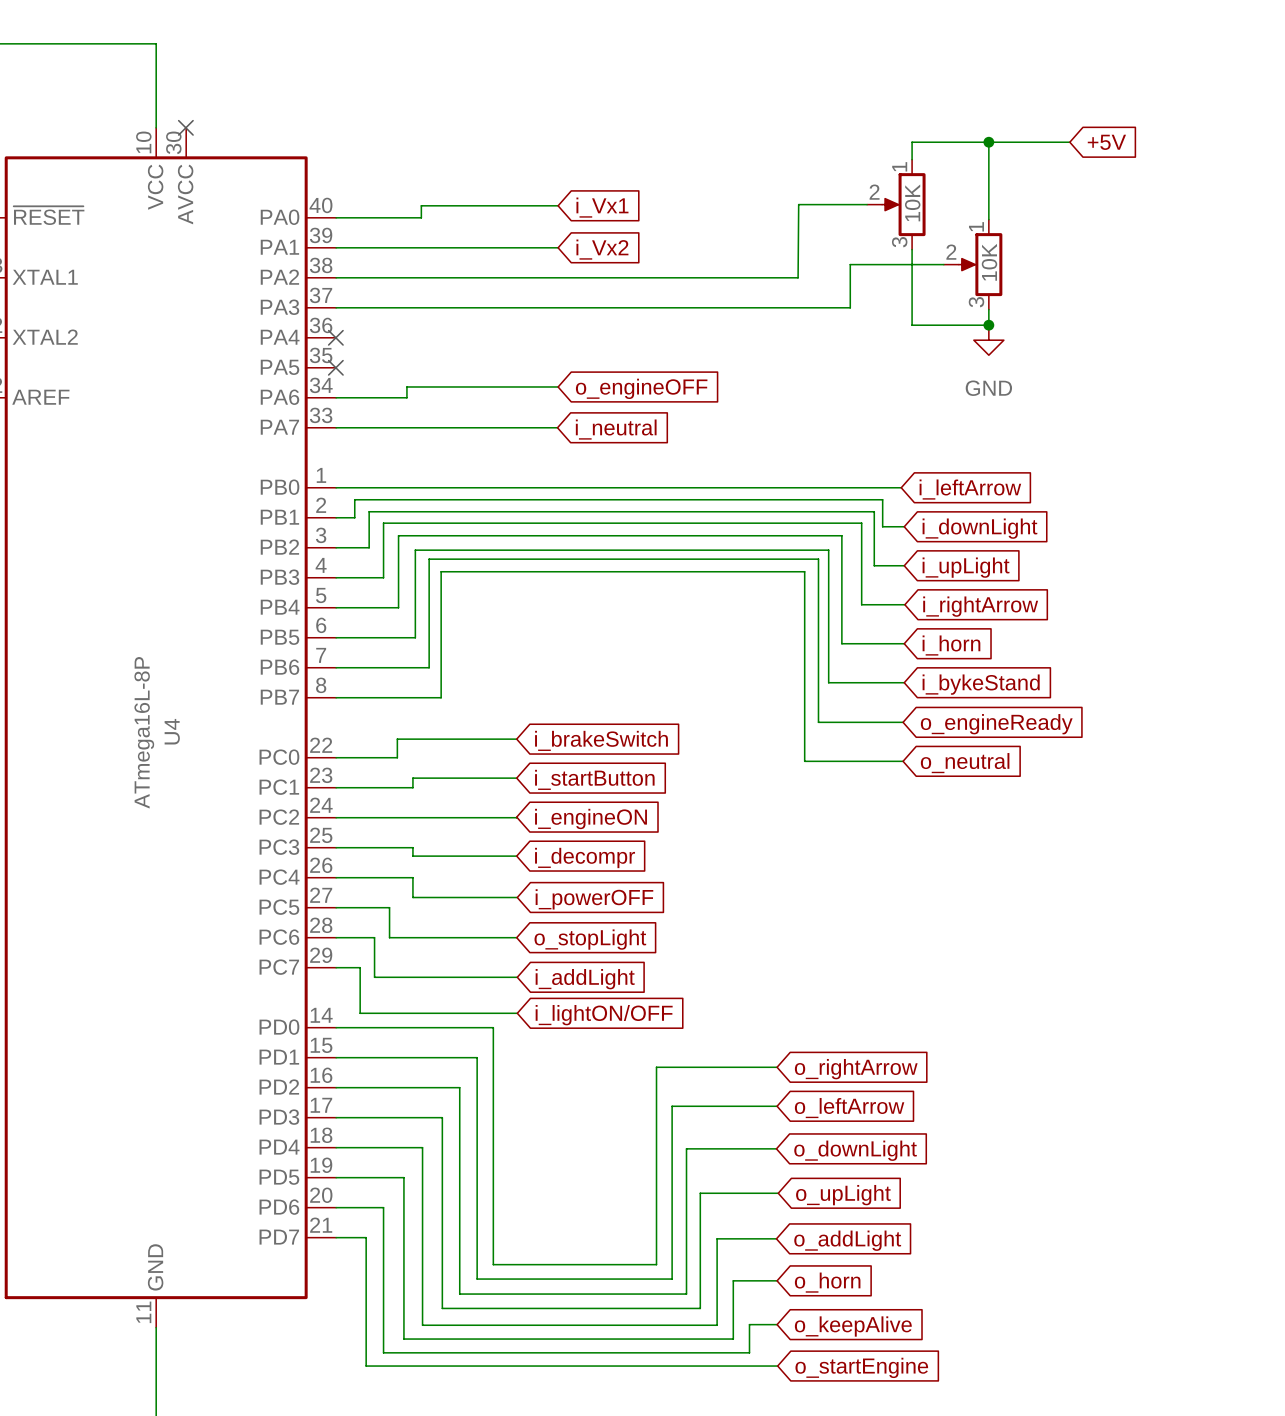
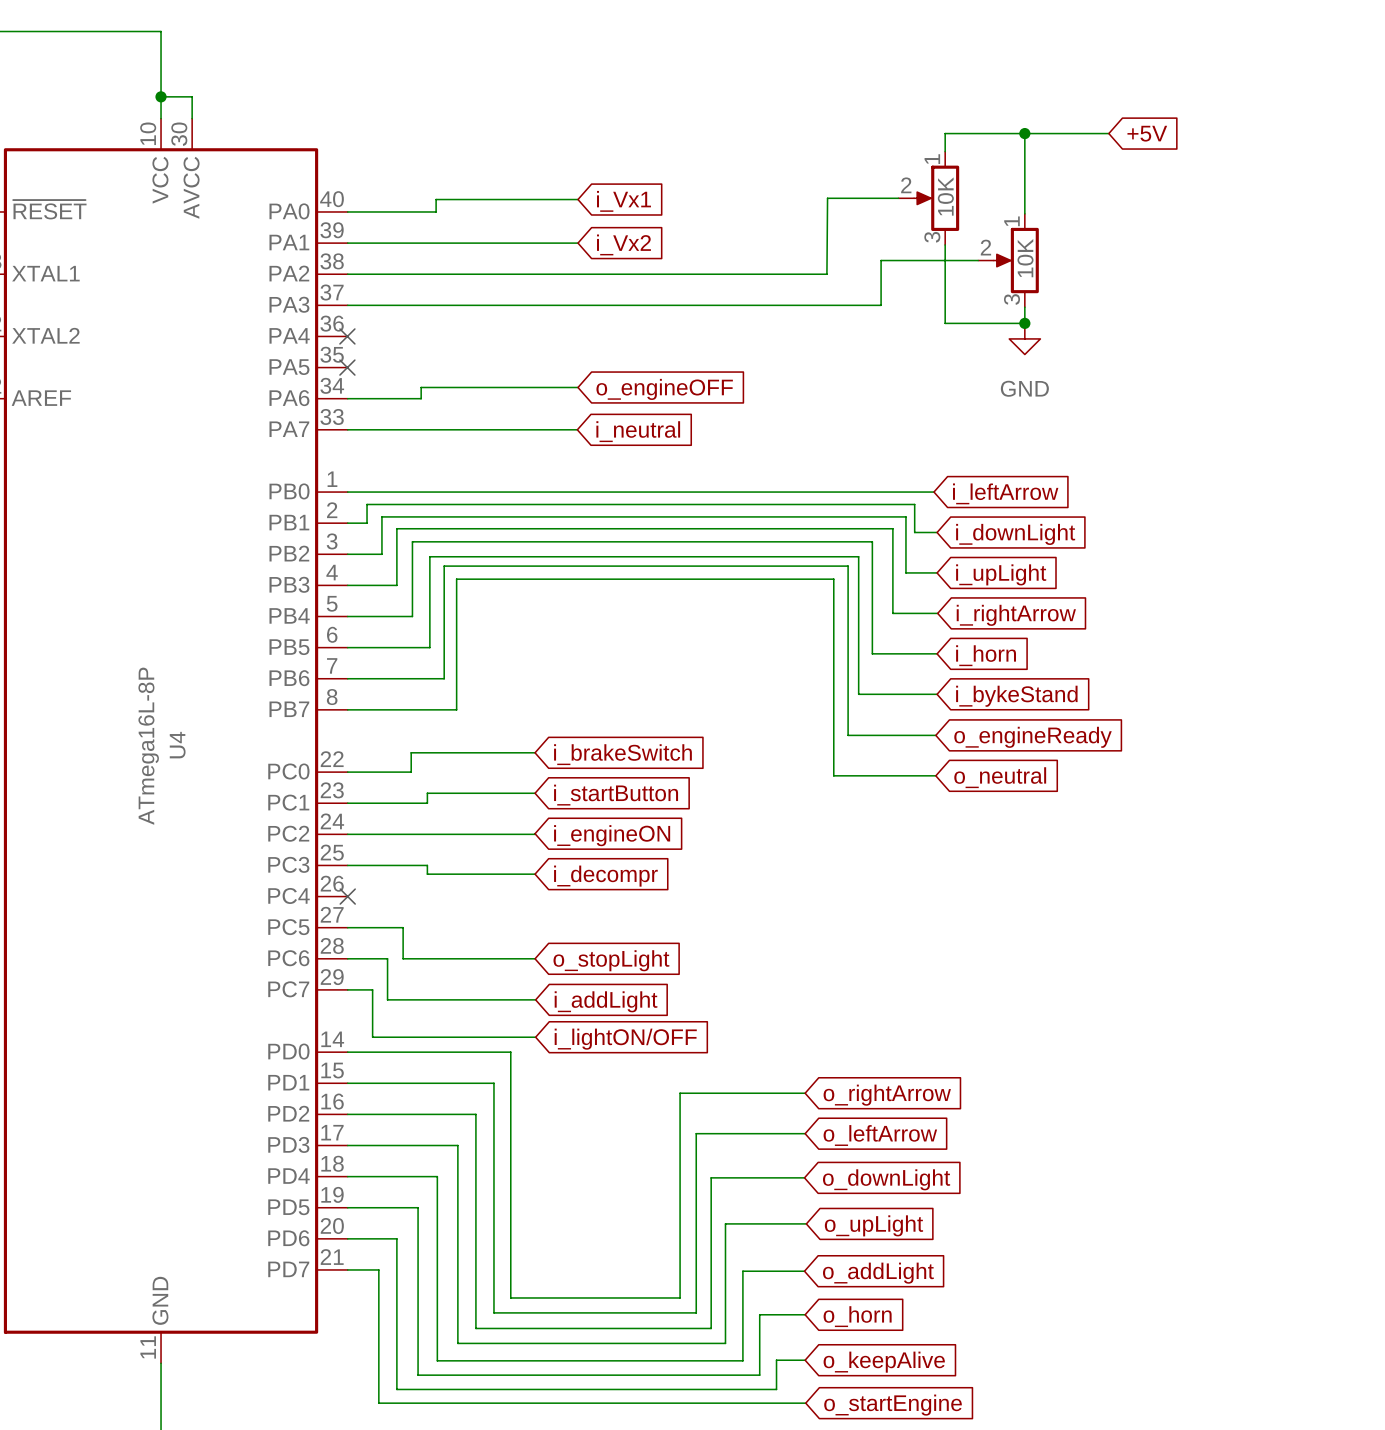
wire: none -> (161, 96) (192, 96) (192, 118)
junction: none -> (161, 96)
no-connect mark: (185, 127) -> none
wire: (336, 877) (412, 877) (412, 897) (517, 897) -> none
no-connect mark: none -> (347, 896)
global label: i_powerOFF (594, 899) -> none

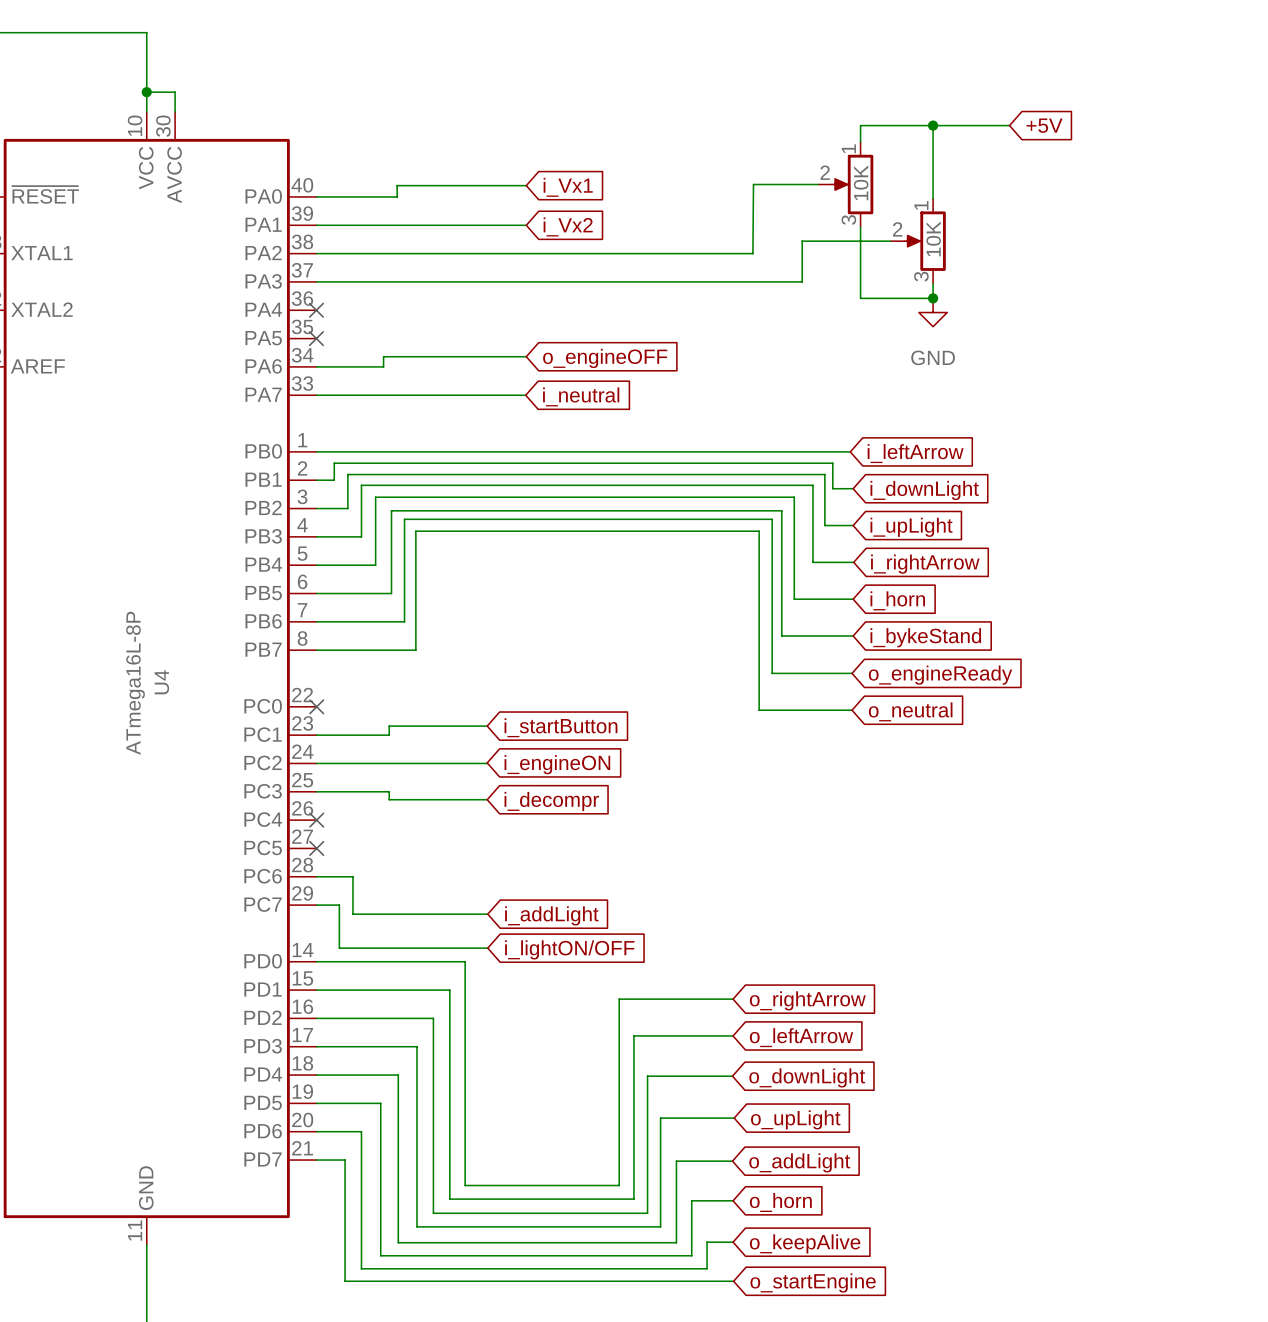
wire: (535, 752) (411, 752) (411, 772) (347, 772) -> none
global label: i_brakeSwitch (622, 754) -> none
no-connect mark: none -> (316, 706)
wire: (347, 927) (403, 927) (403, 958) (535, 958) -> none
no-connect mark: none -> (316, 848)
global label: o_stopLight (611, 960) -> none

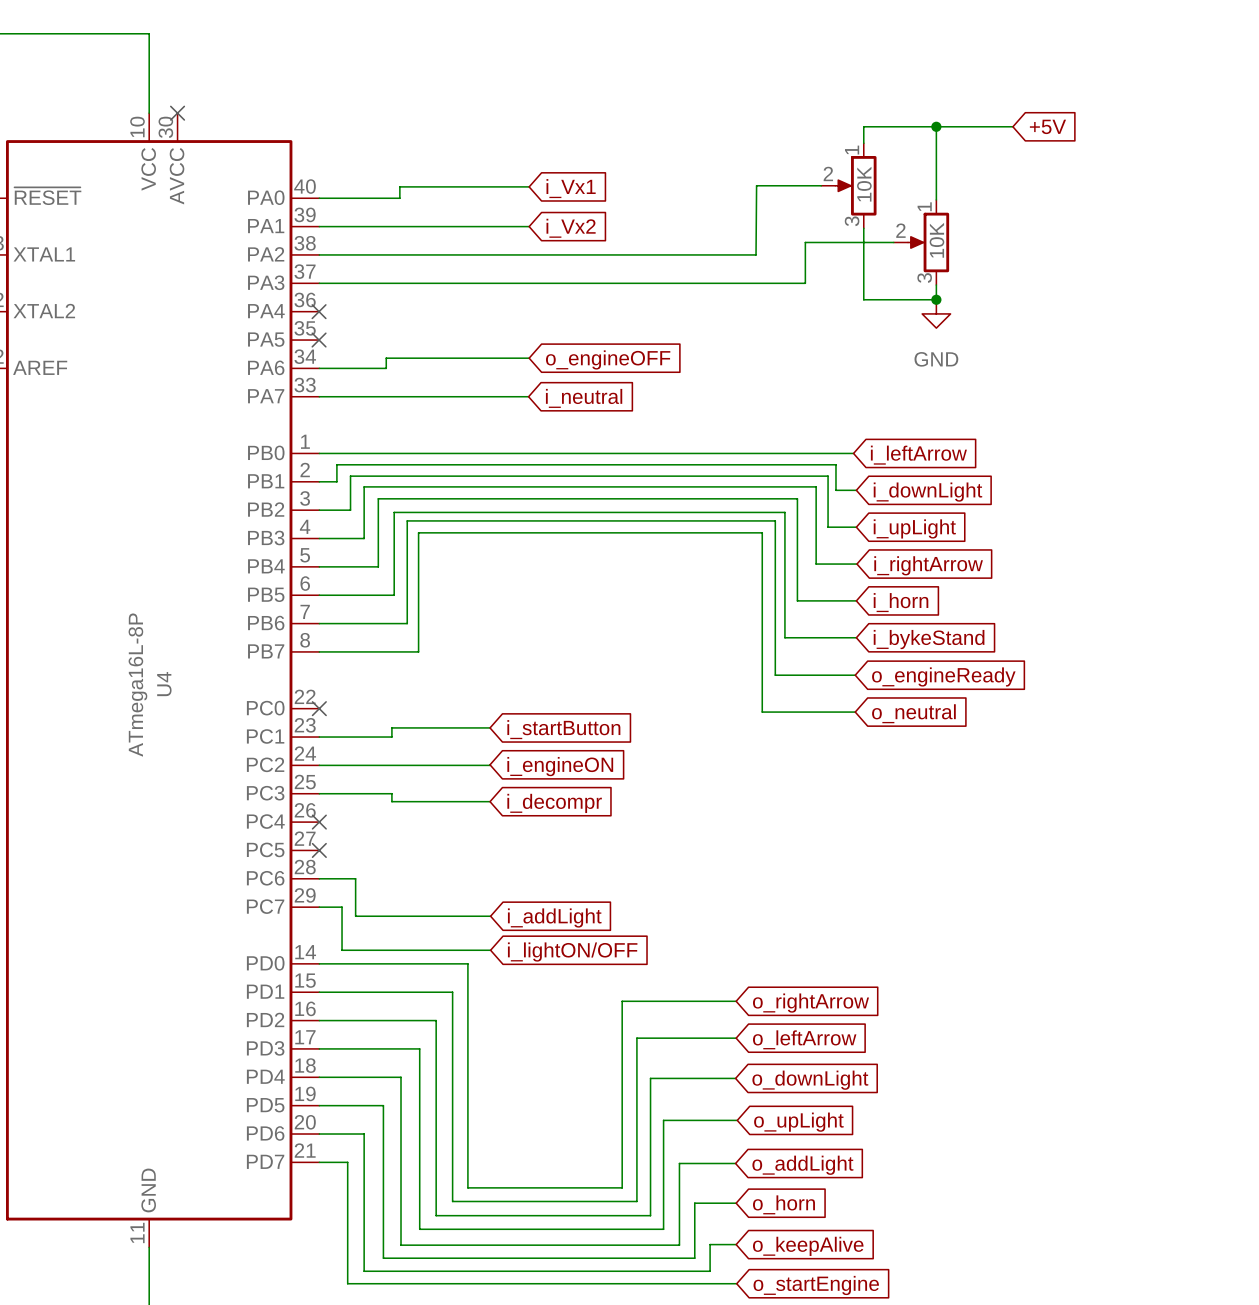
wire: (146, 92) (175, 92) (175, 112) -> none
junction: (146, 92) -> none
no-connect mark: none -> (177, 113)

